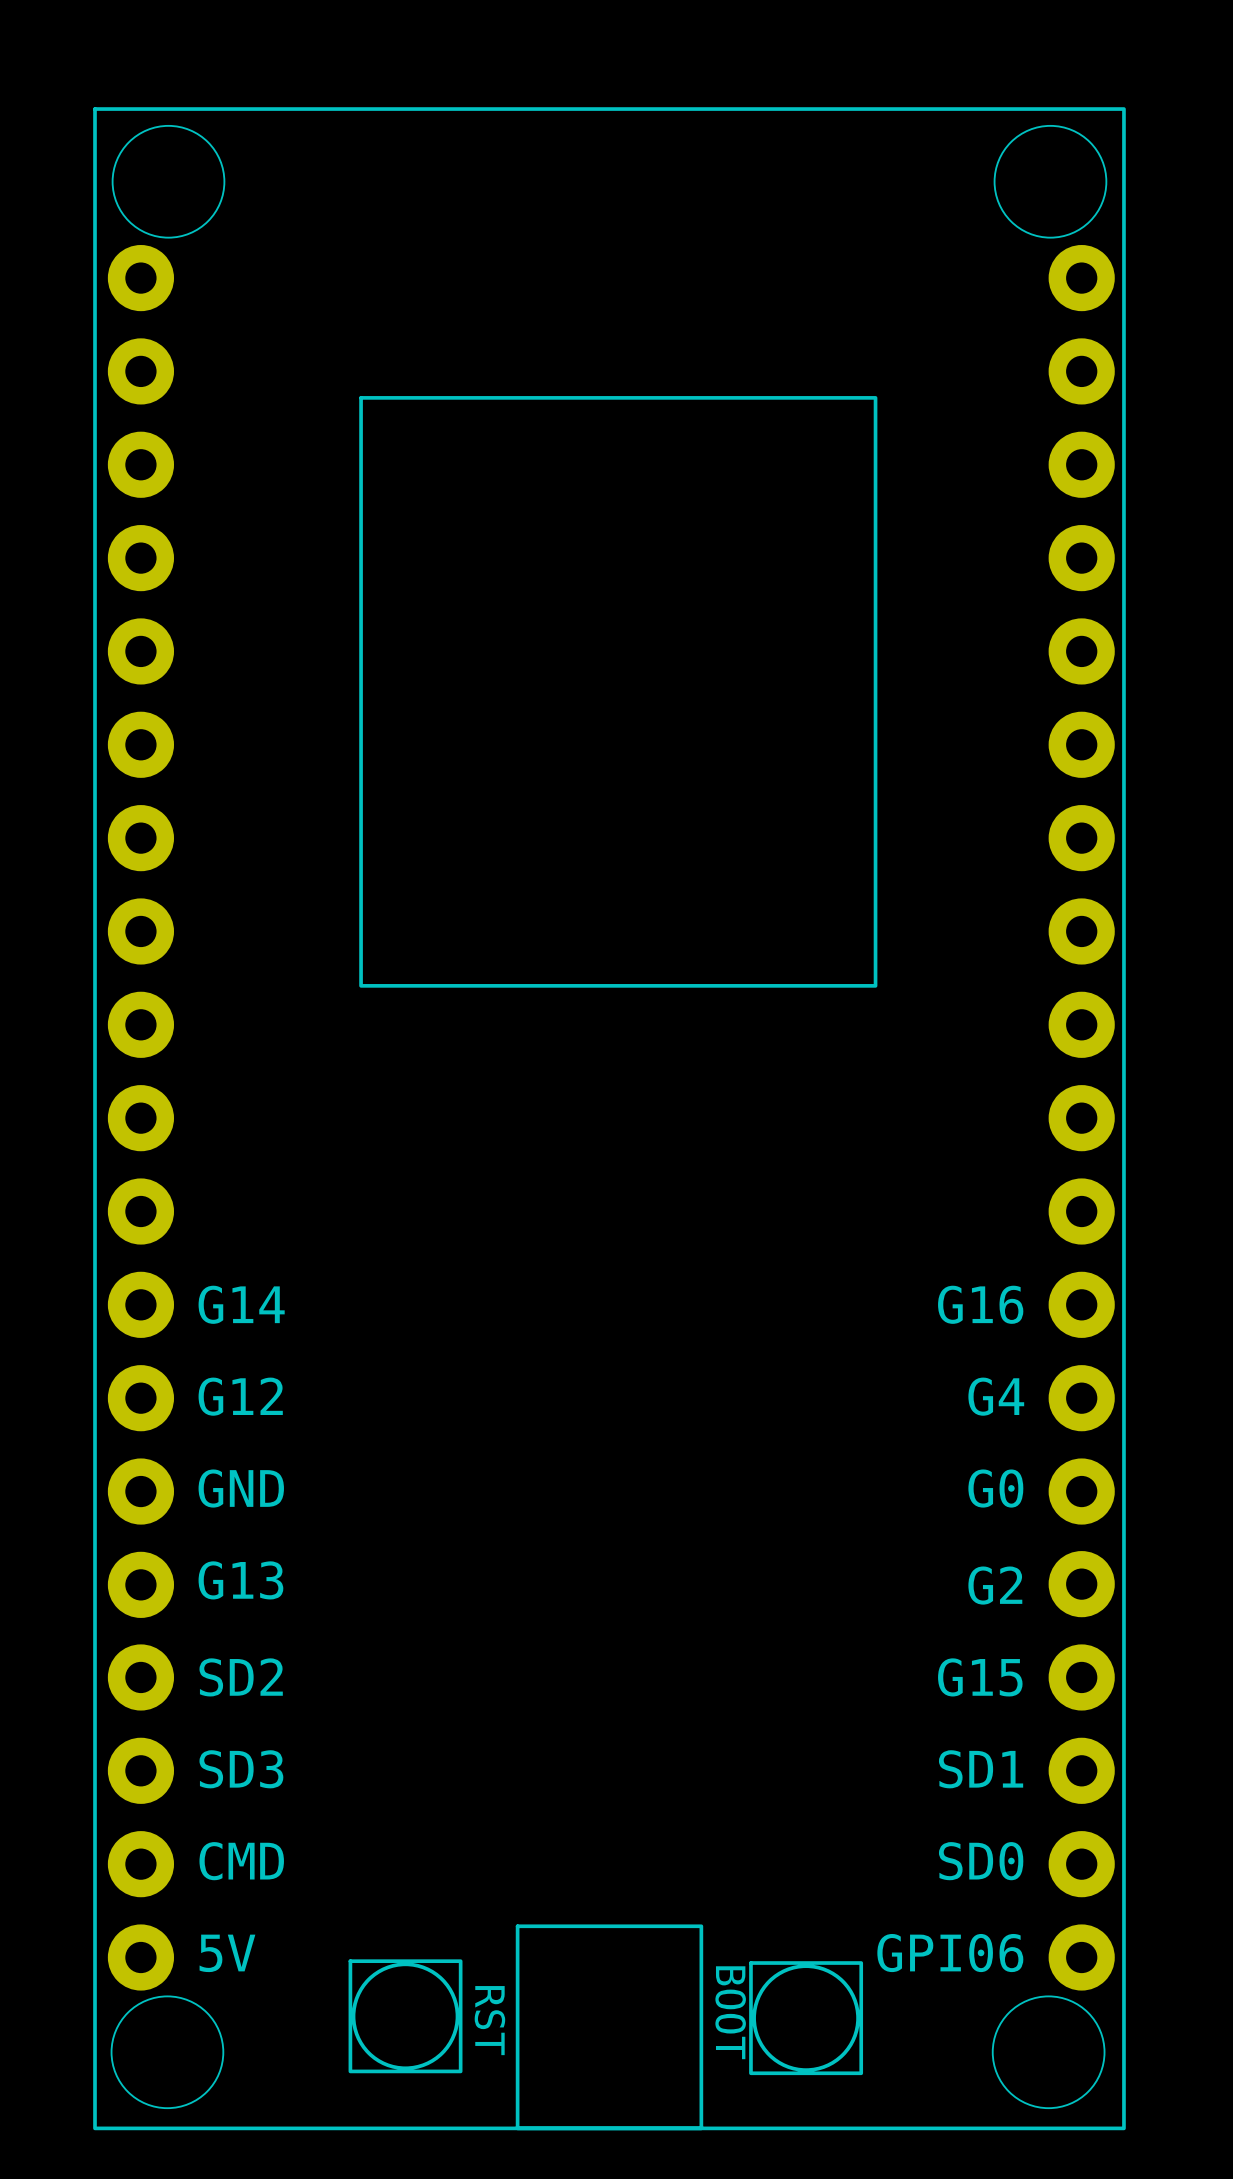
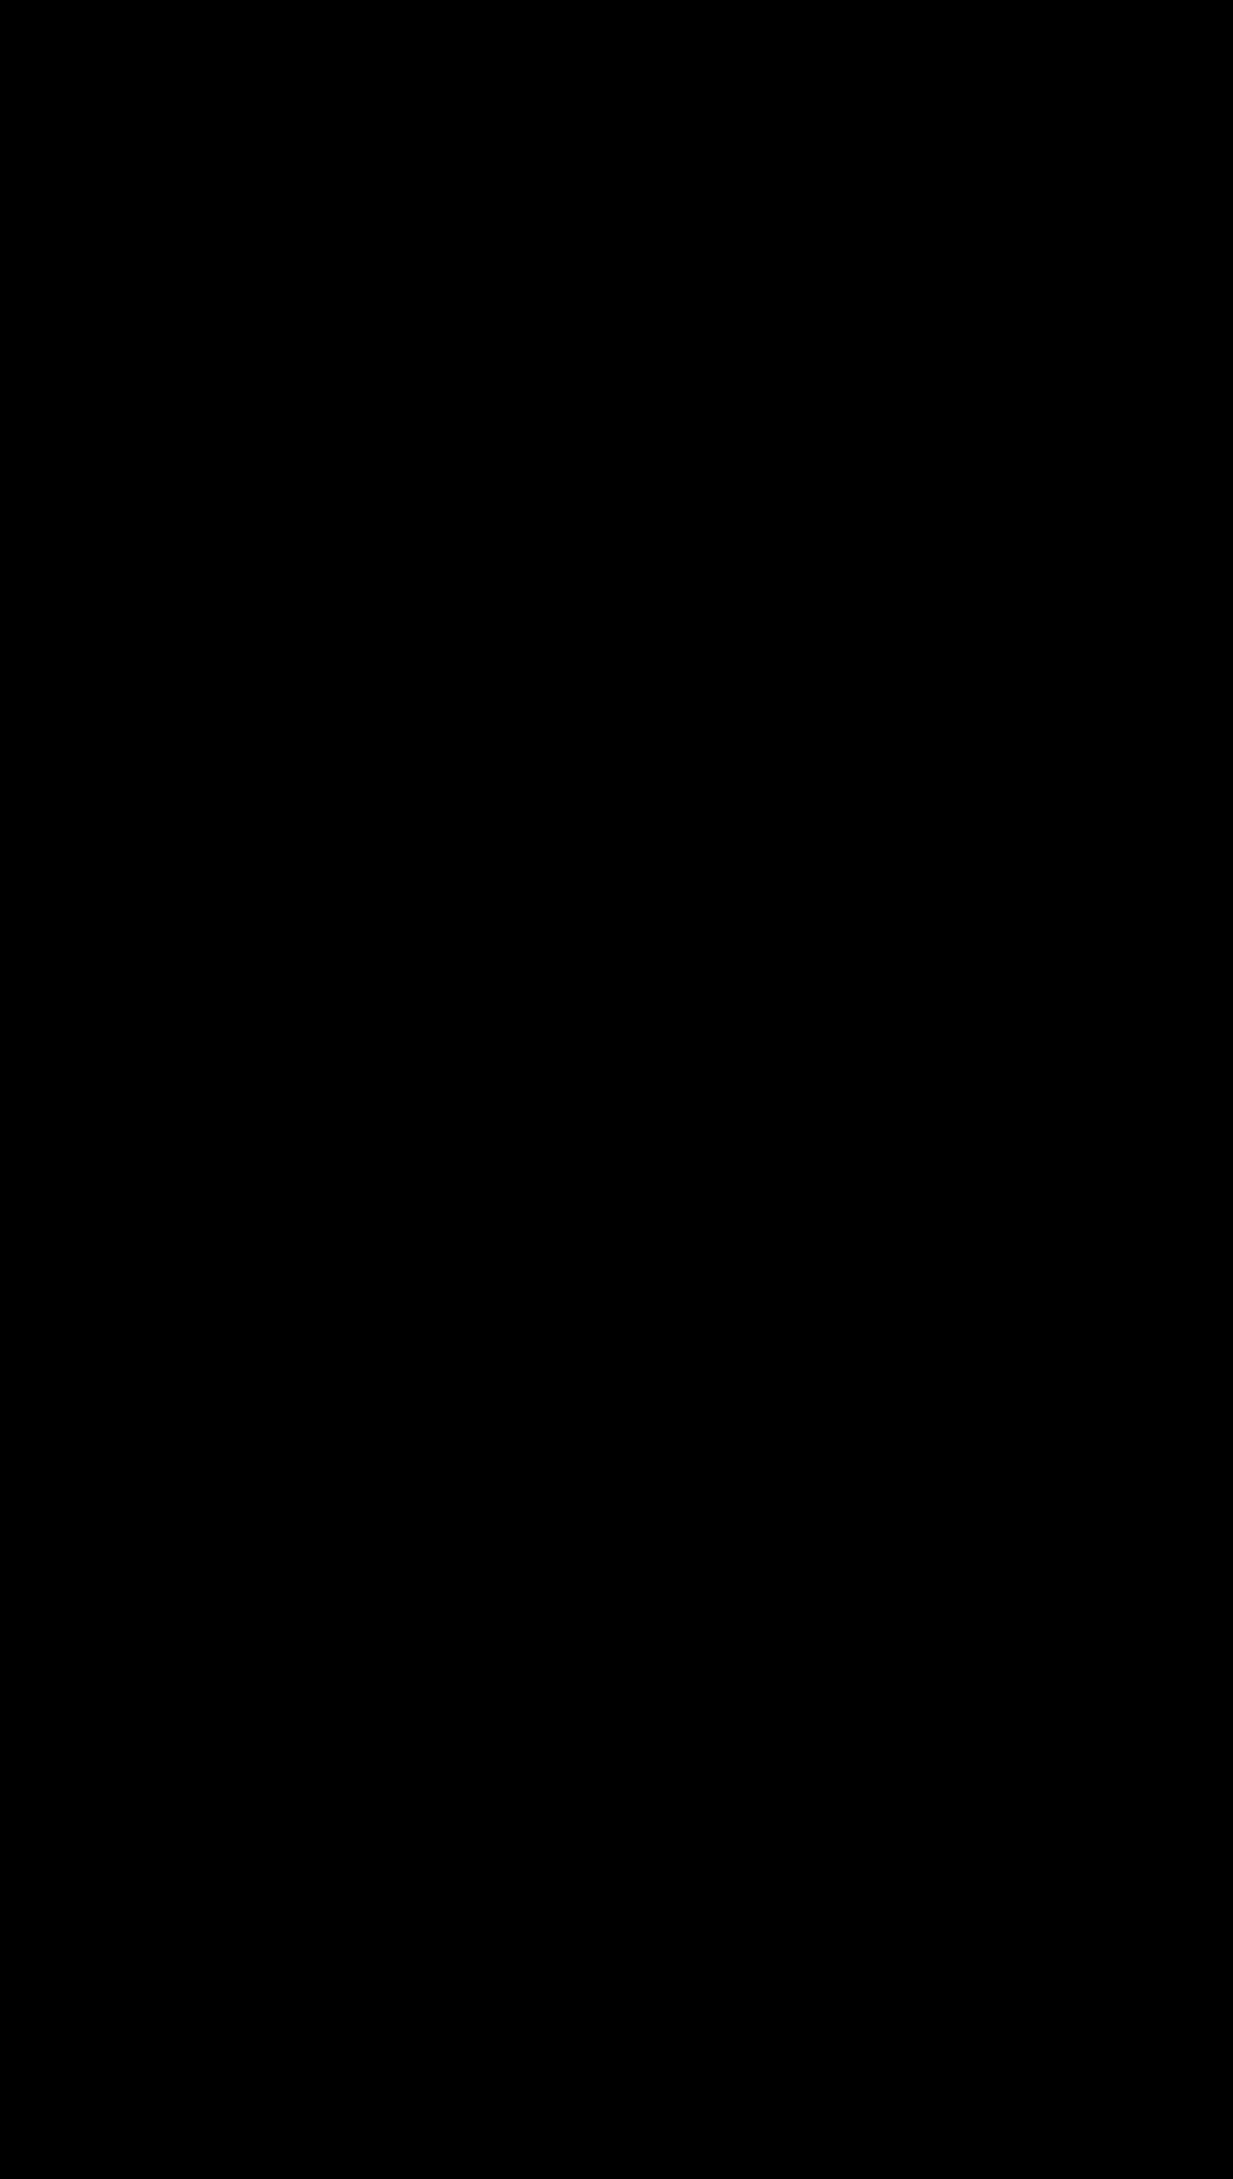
part: (609, 1118) -> none

